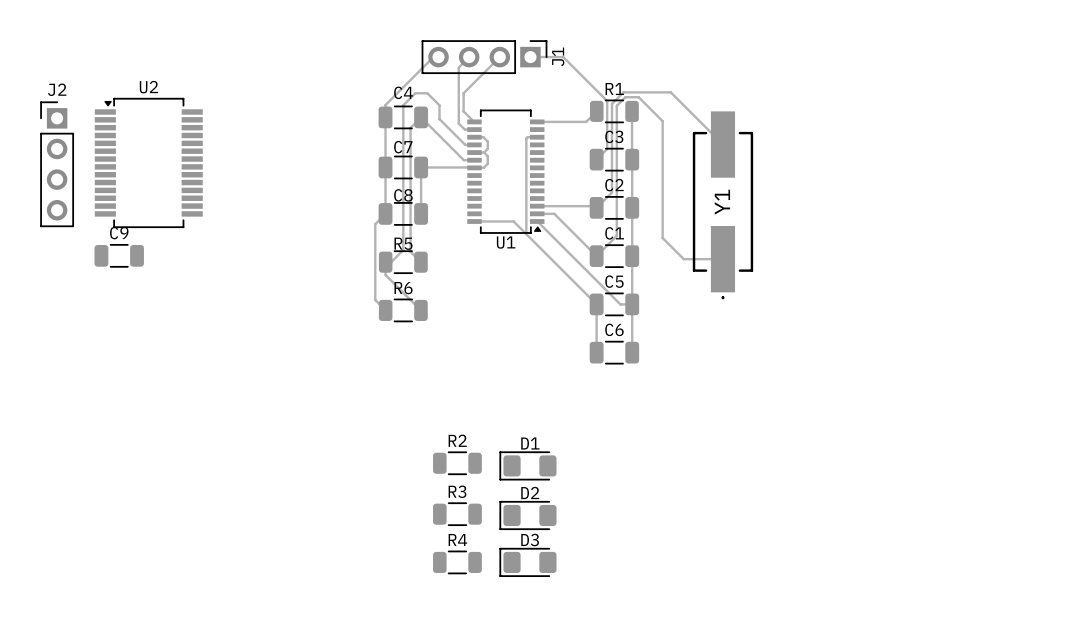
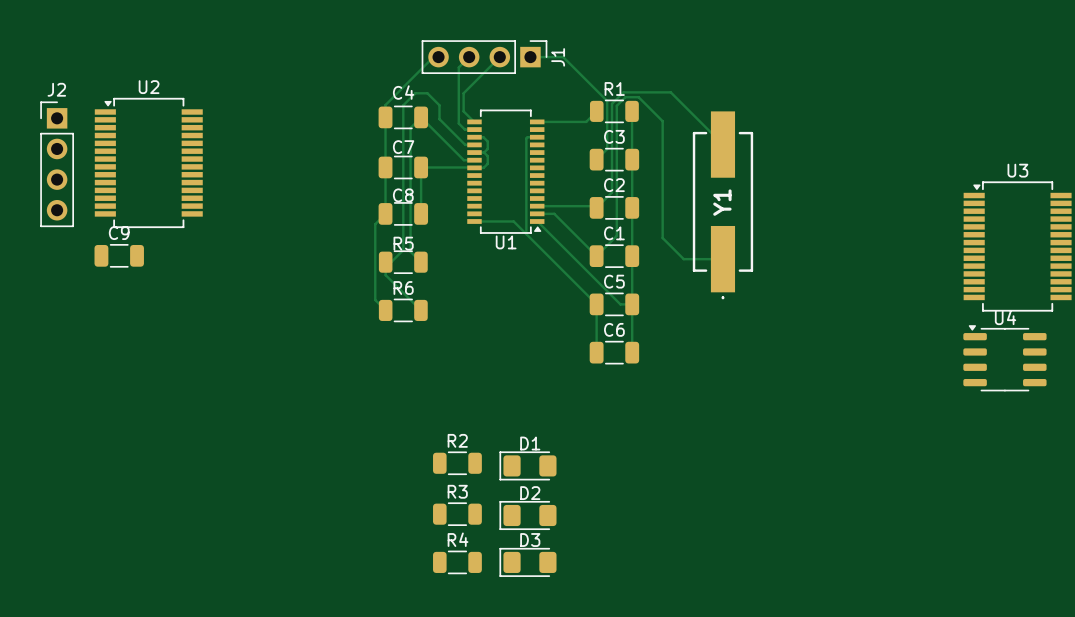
U3: none -> (1017, 246)
U4: none -> (1004, 358)

